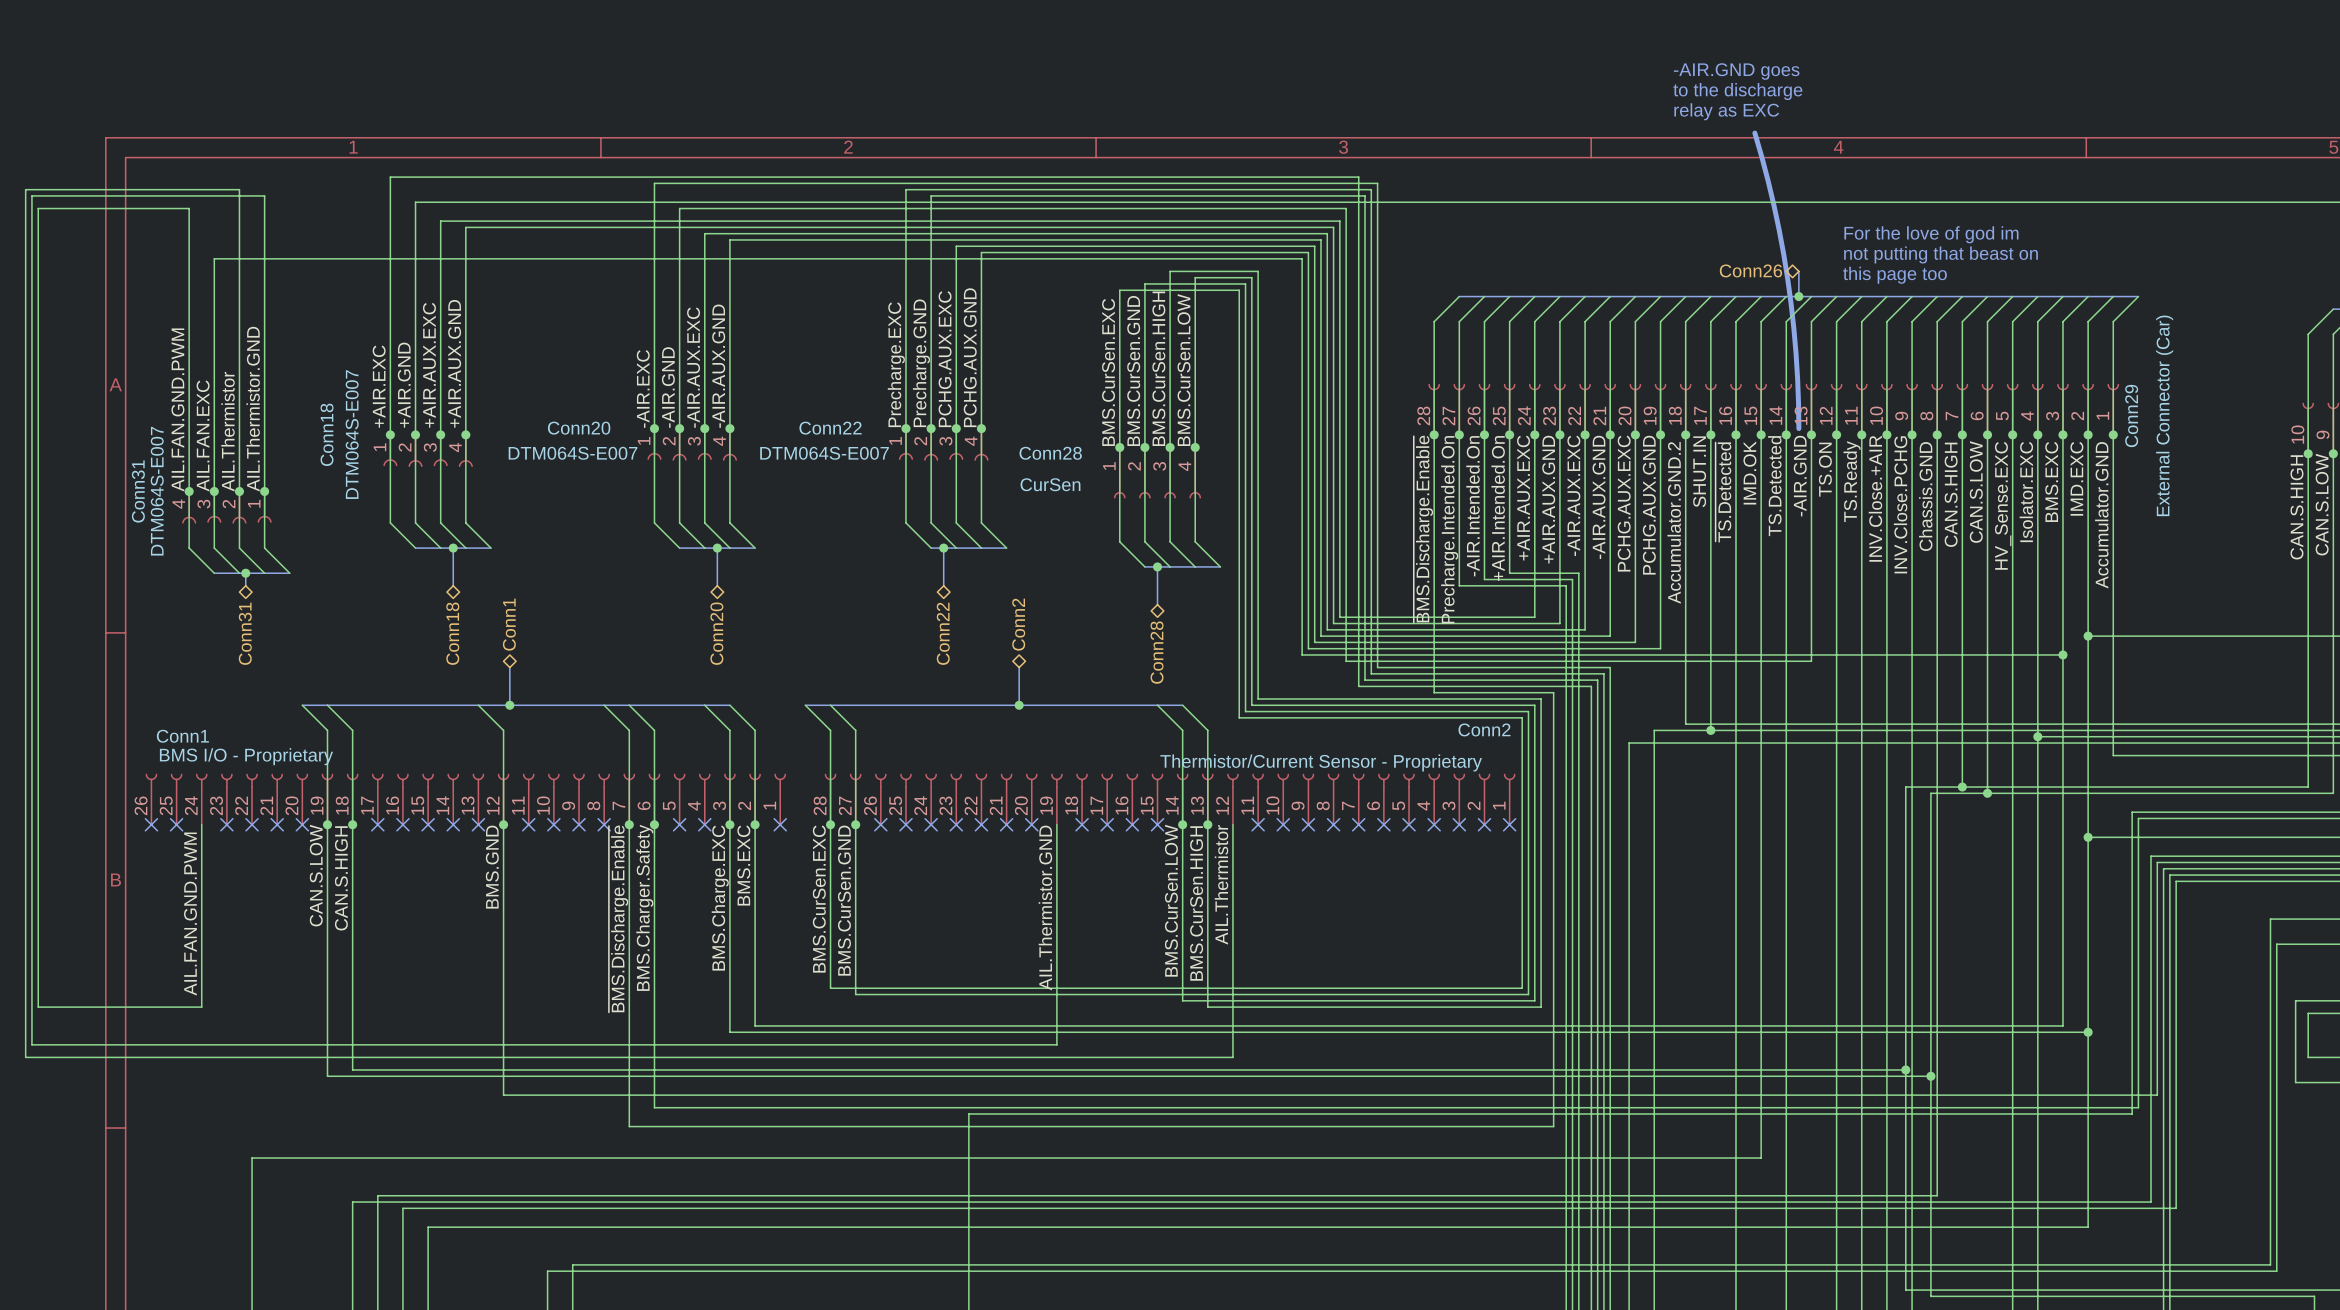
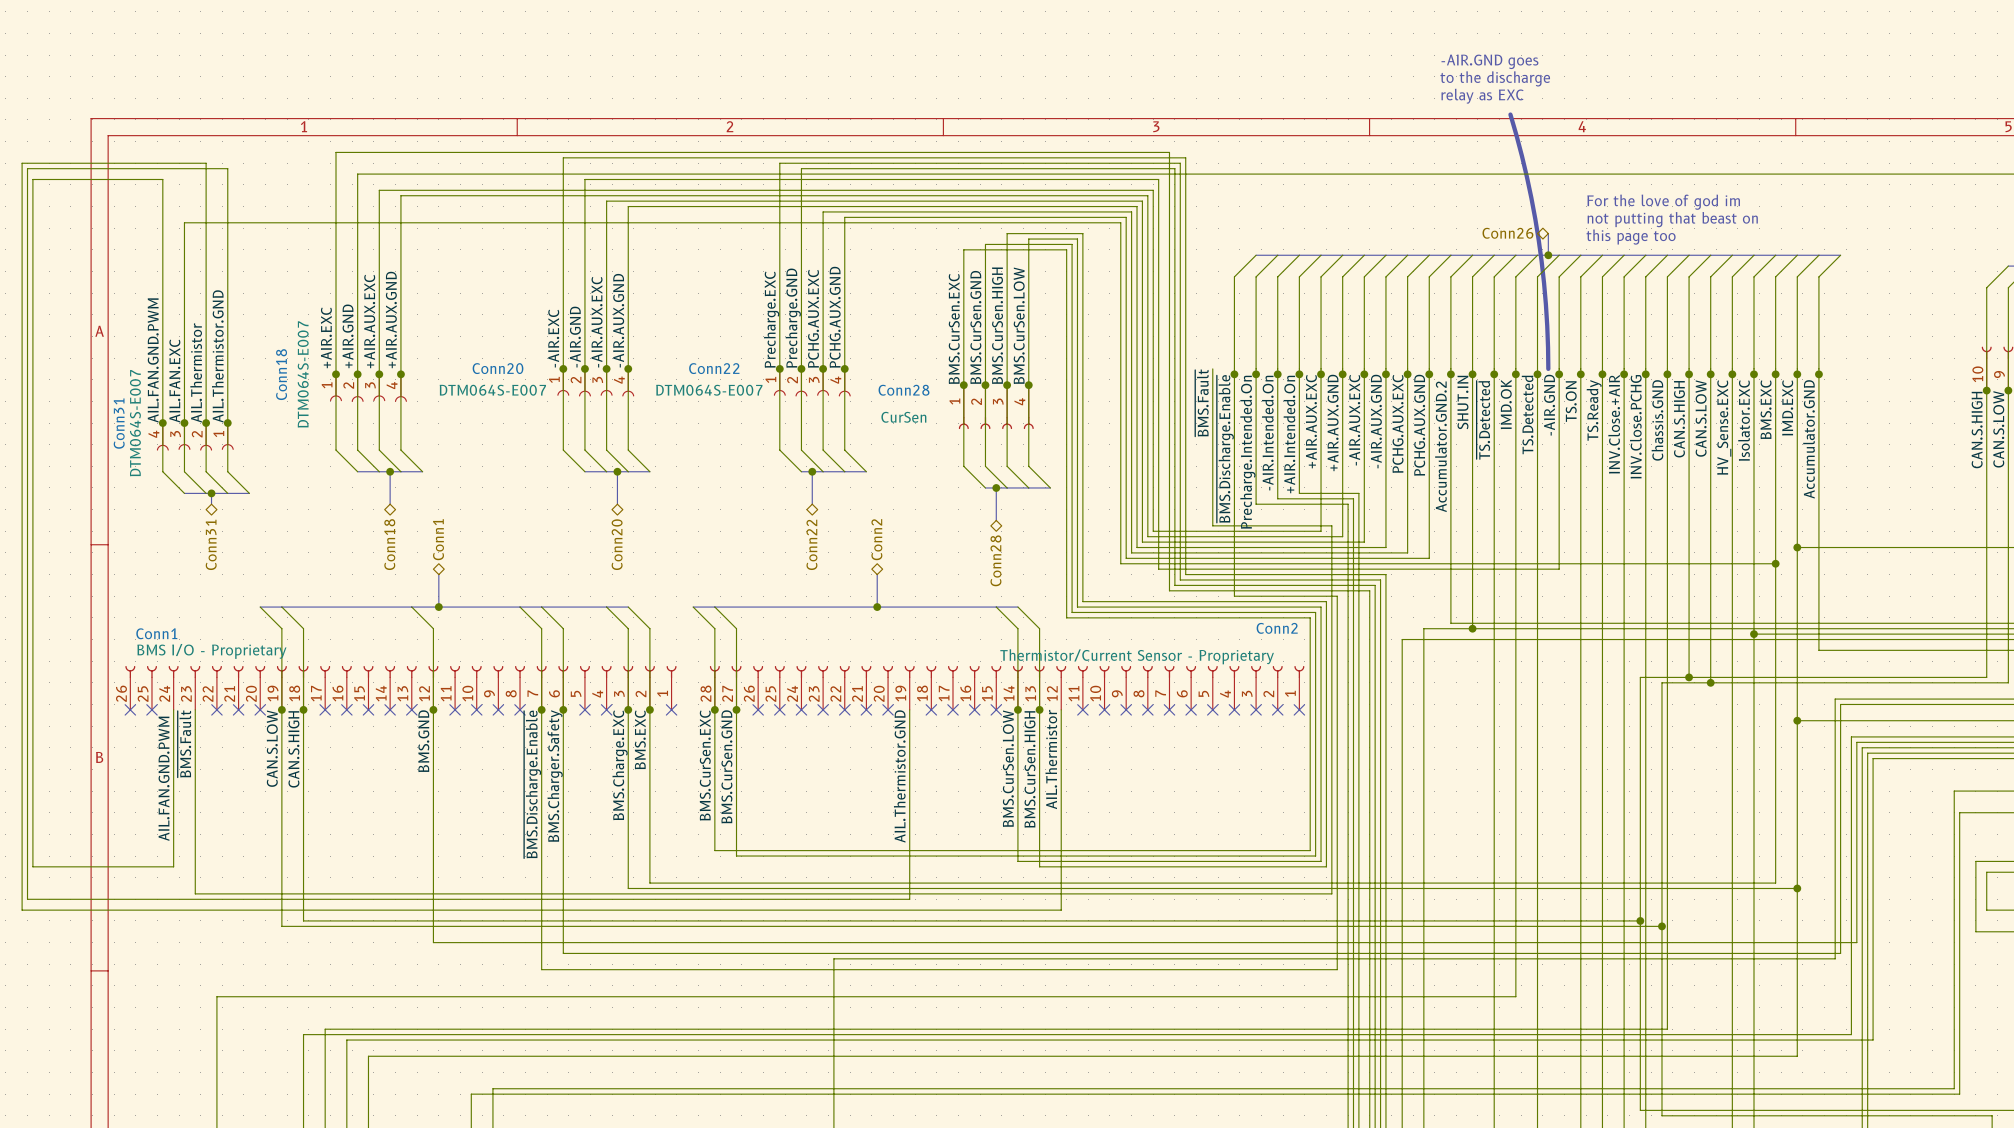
Conn29: External Connector (Car) (1773, 409) -> none
wire: none -> (1212, 368) (1212, 525) (1331, 525) (1331, 893) (195, 893) (195, 709)
label: none -> ~{BMS.Fault} (1201, 403)
no-connect mark: (226, 824) -> none
label: none -> ~{BMS.Fault} (184, 743)

